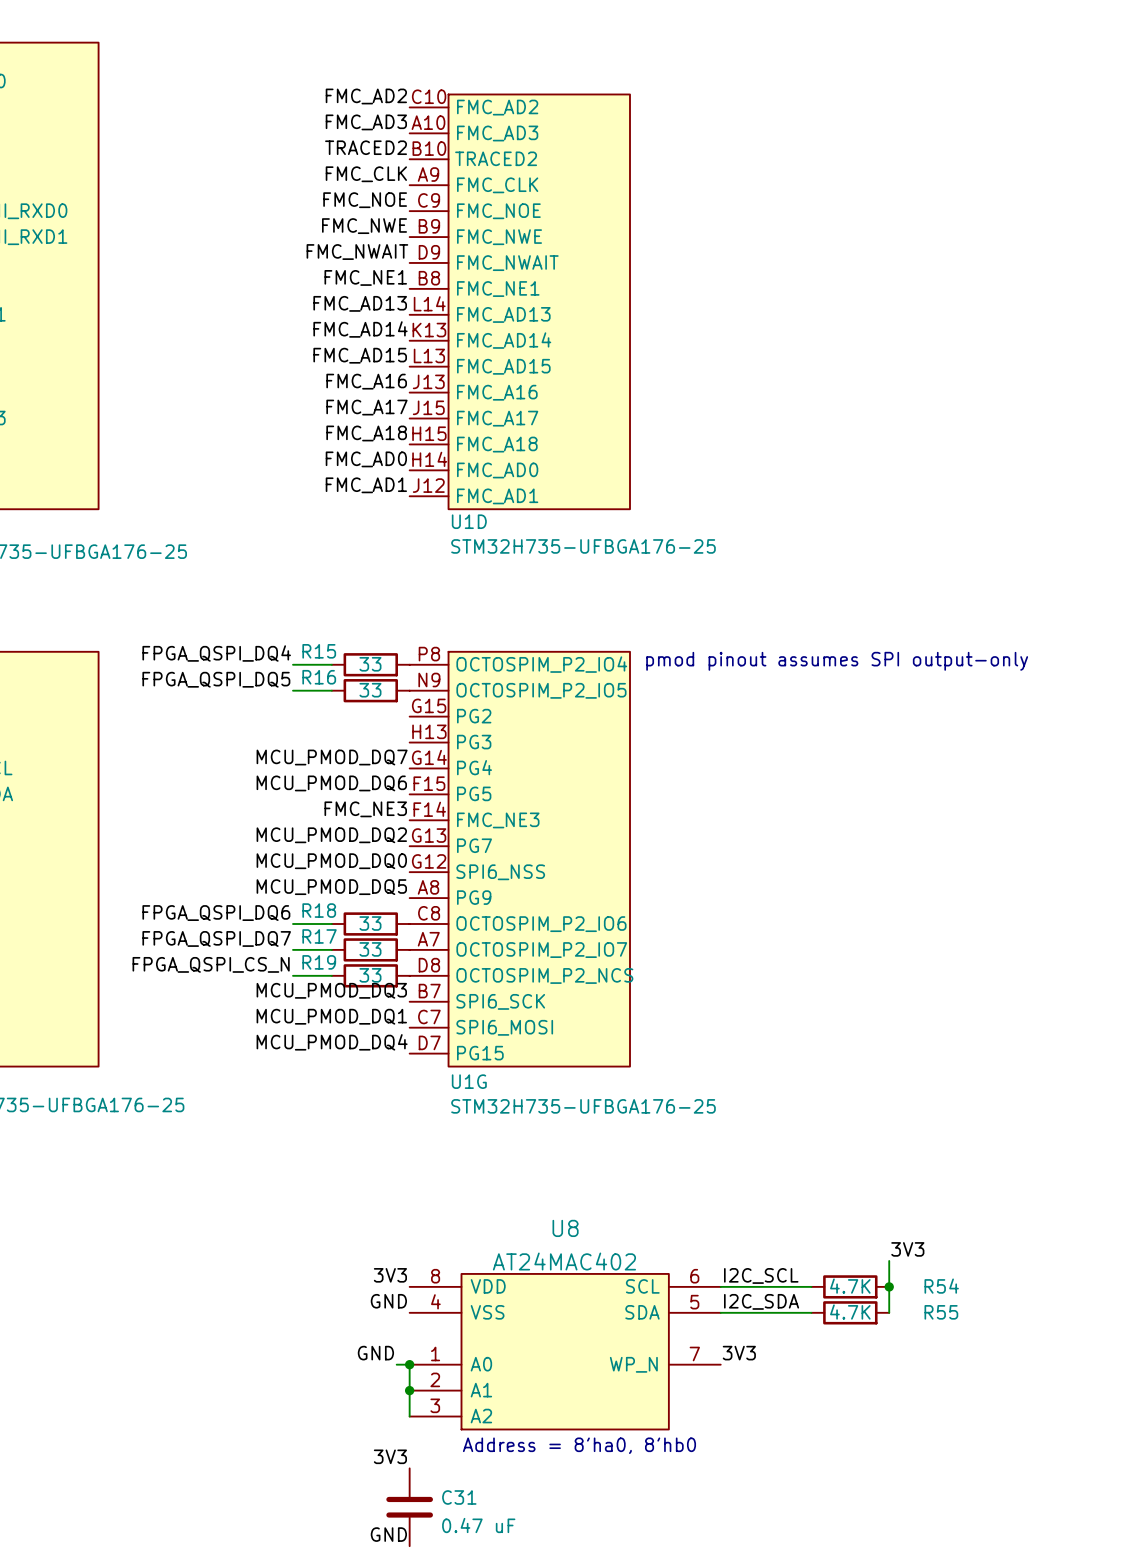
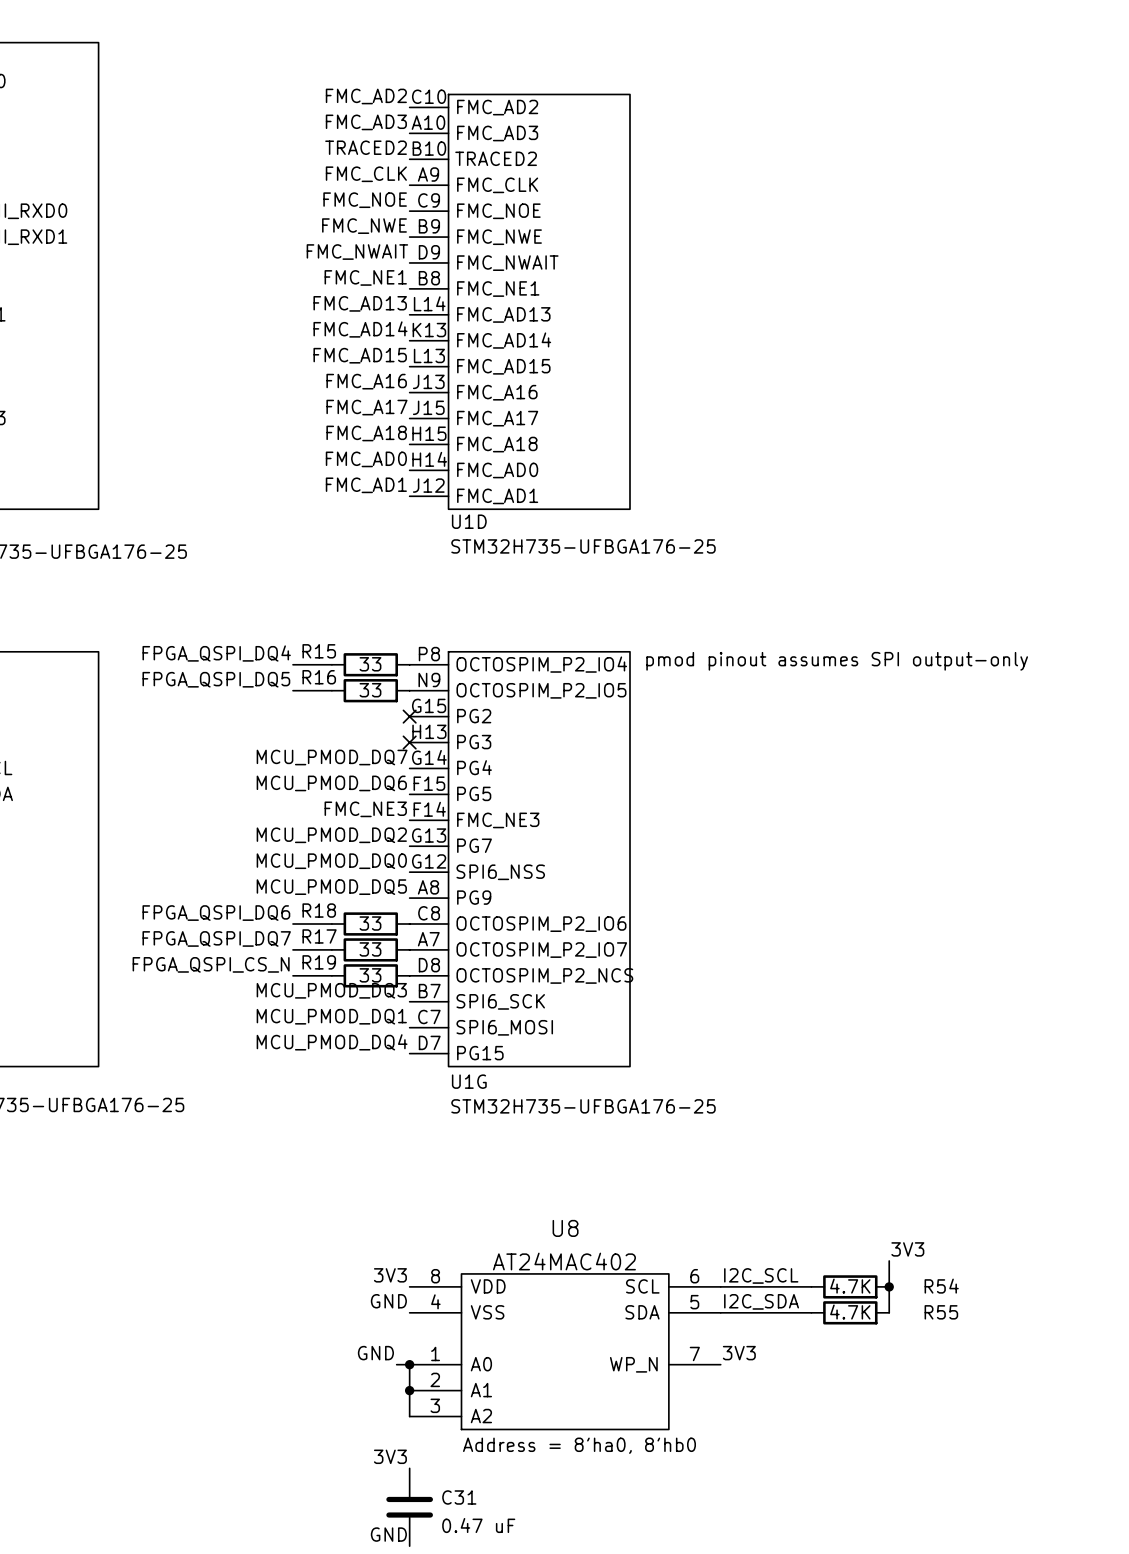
no-connect mark: none -> (409, 716)
no-connect mark: none -> (409, 742)

